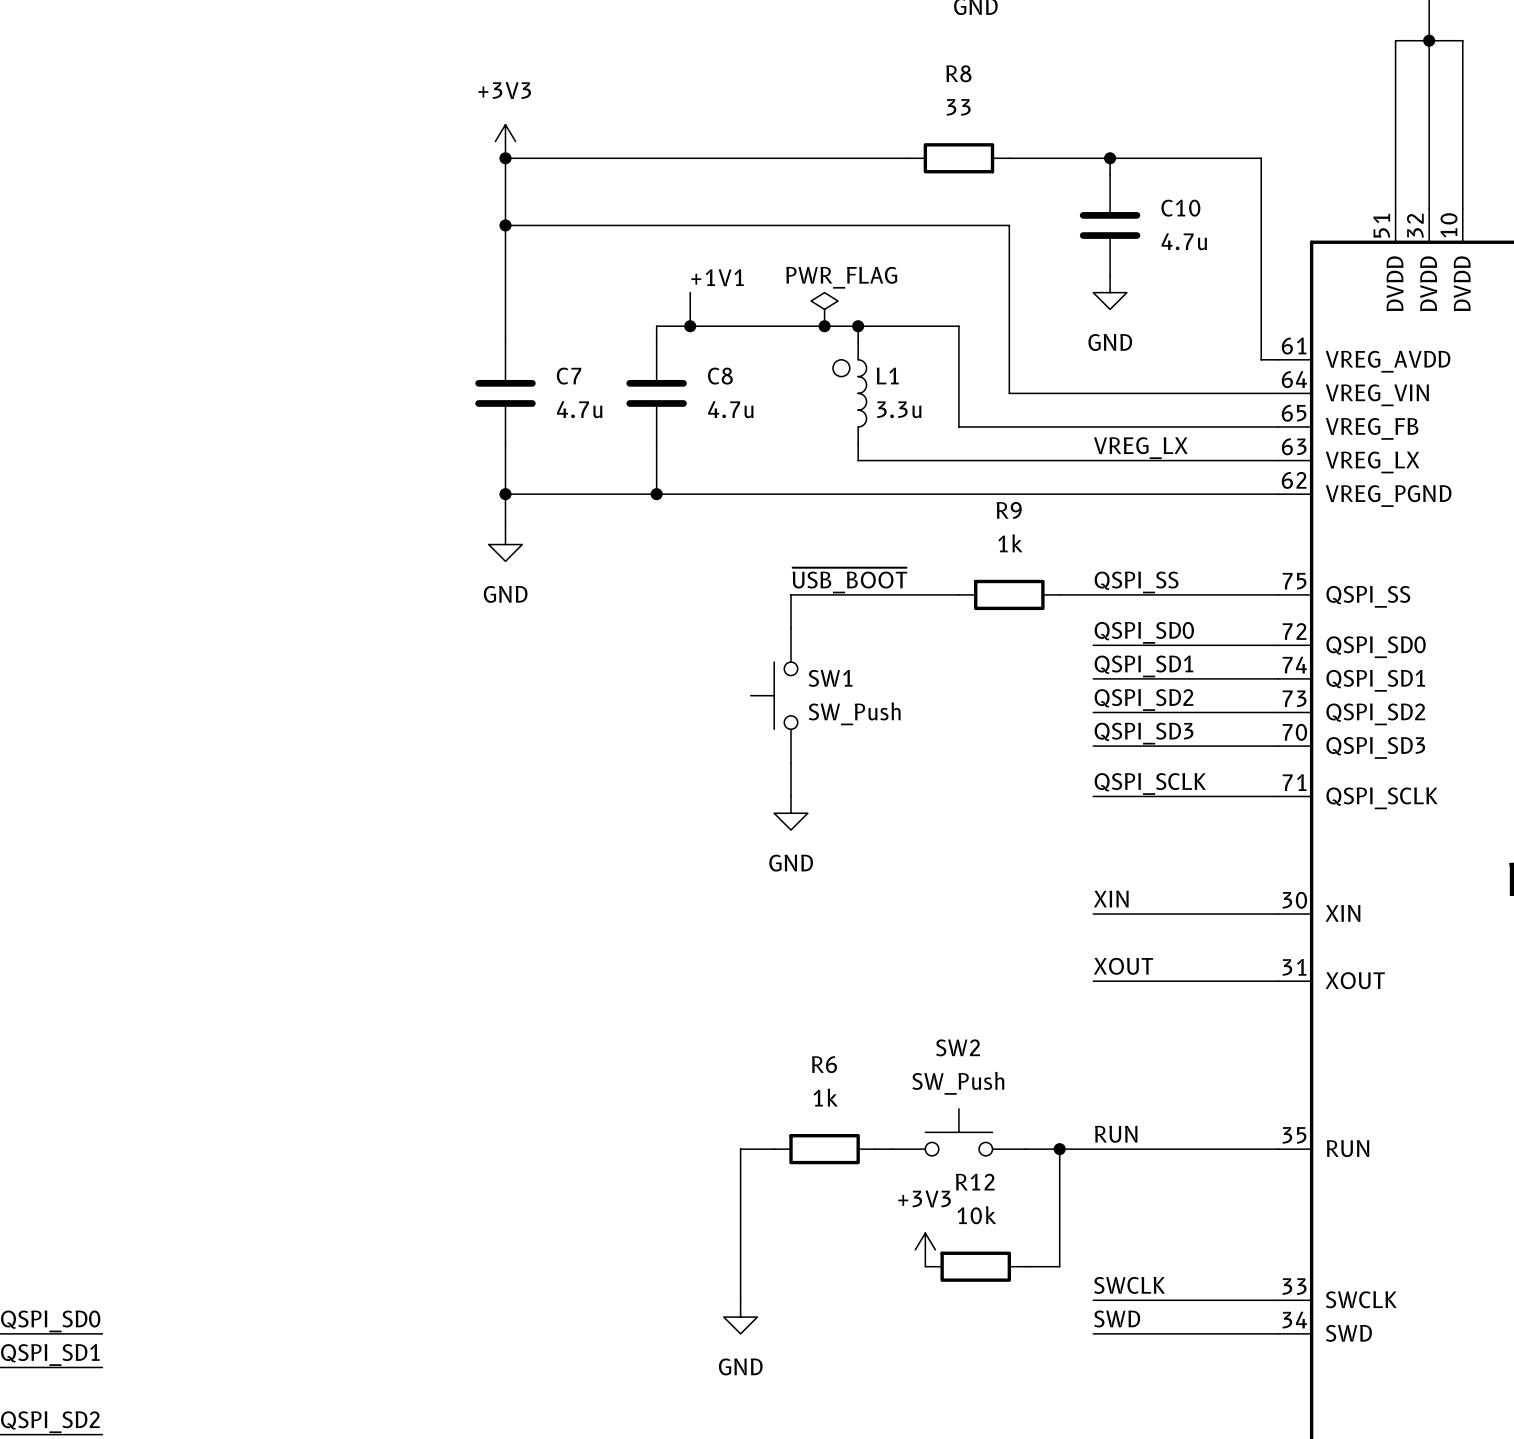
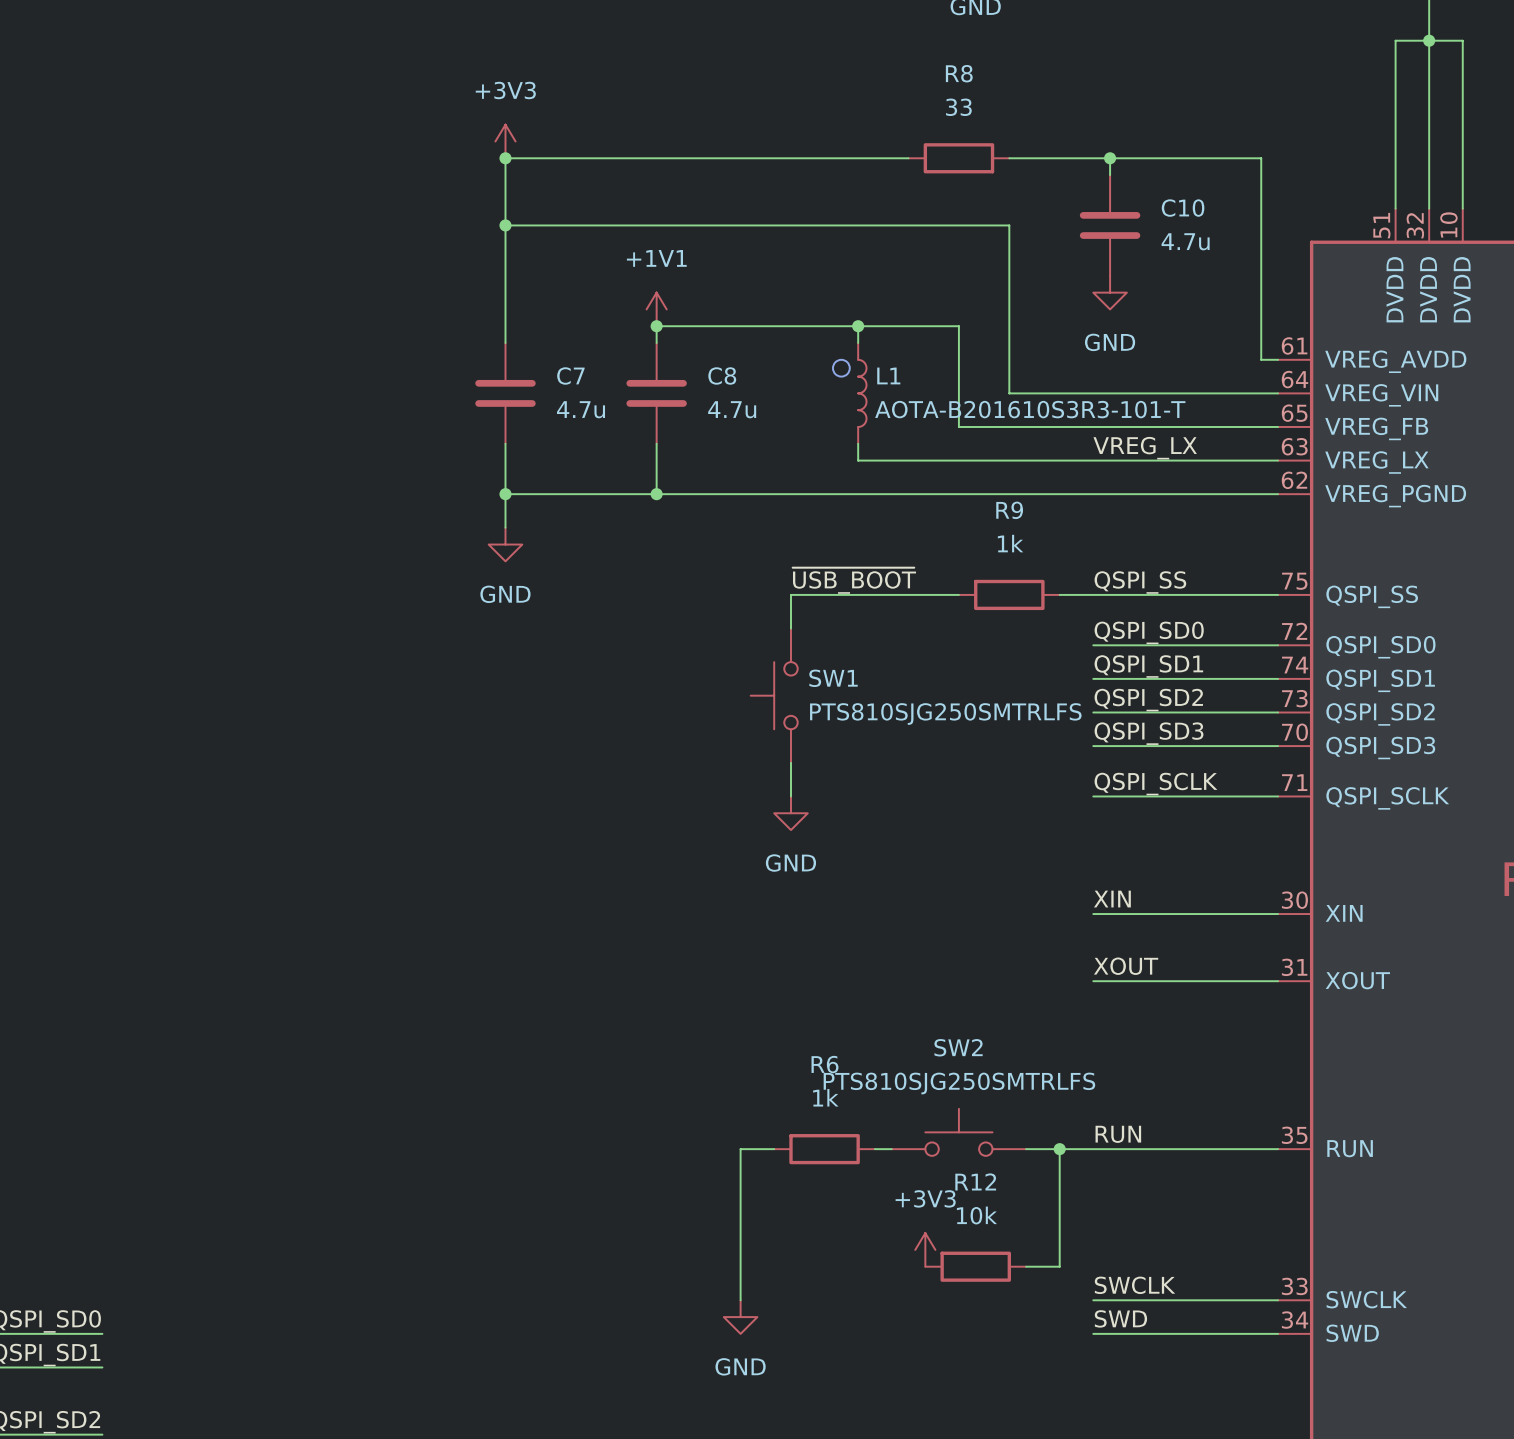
label: +1V1 (717, 277) -> none
wire: (690, 292) (690, 326) -> none
power symbol: none -> +1V1 (656, 309)
power symbol: PWR_FLAG (824, 309) -> none
junction position: (690, 326) -> (656, 326)
junction: (824, 326) -> none
L1 value: 3.3u (899, 409) -> AOTA-B201610S3R3-101-T (1030, 409)
SW1 value: SW_Push (854, 713) -> PTS810SJG250SMTRLFS (945, 714)
SW2 value: SW_Push (958, 1083) -> PTS810SJG250SMTRLFS (959, 1083)

